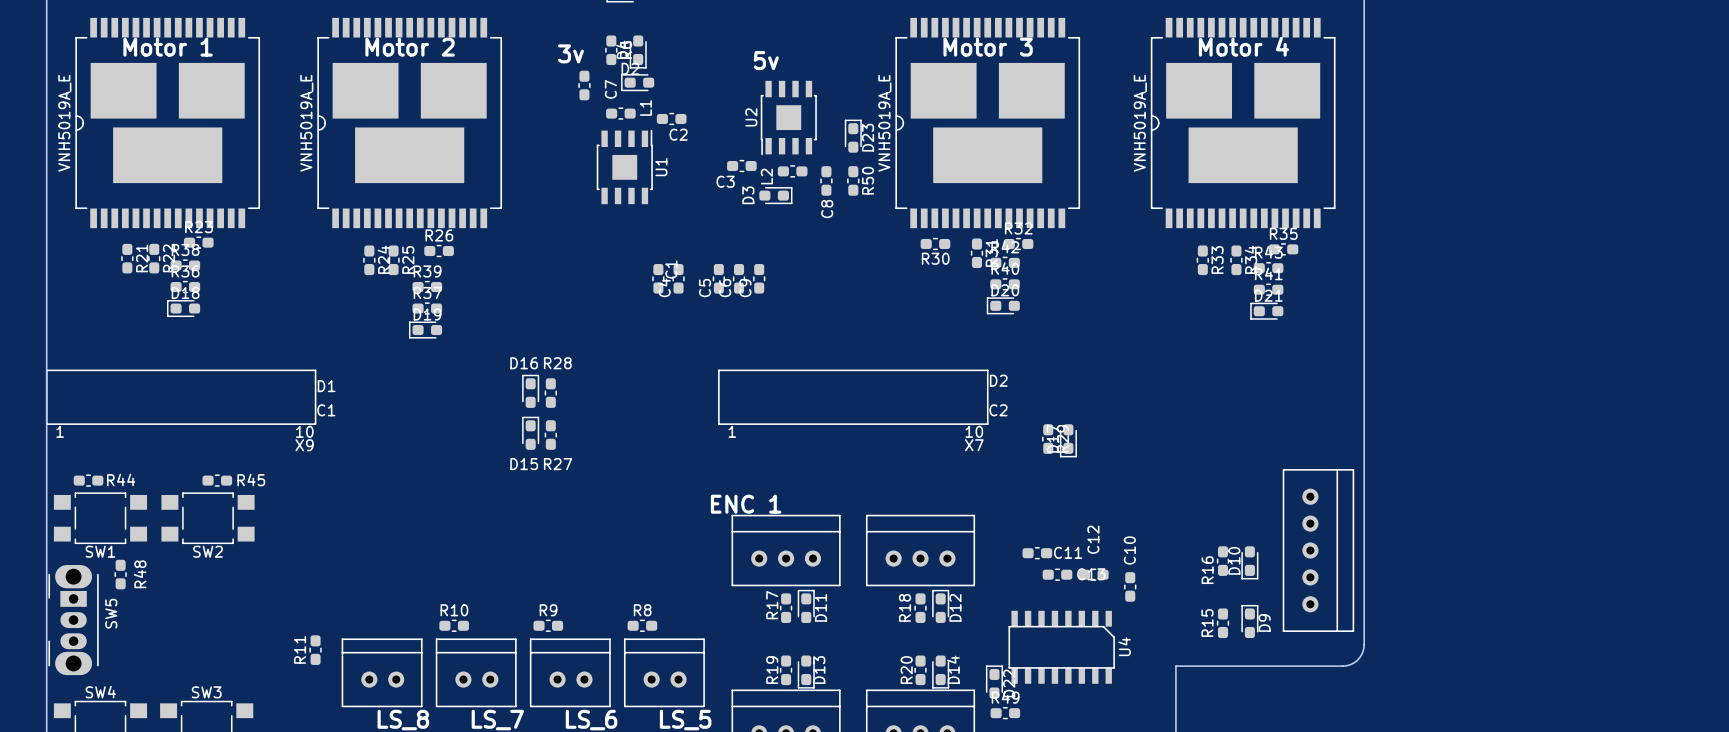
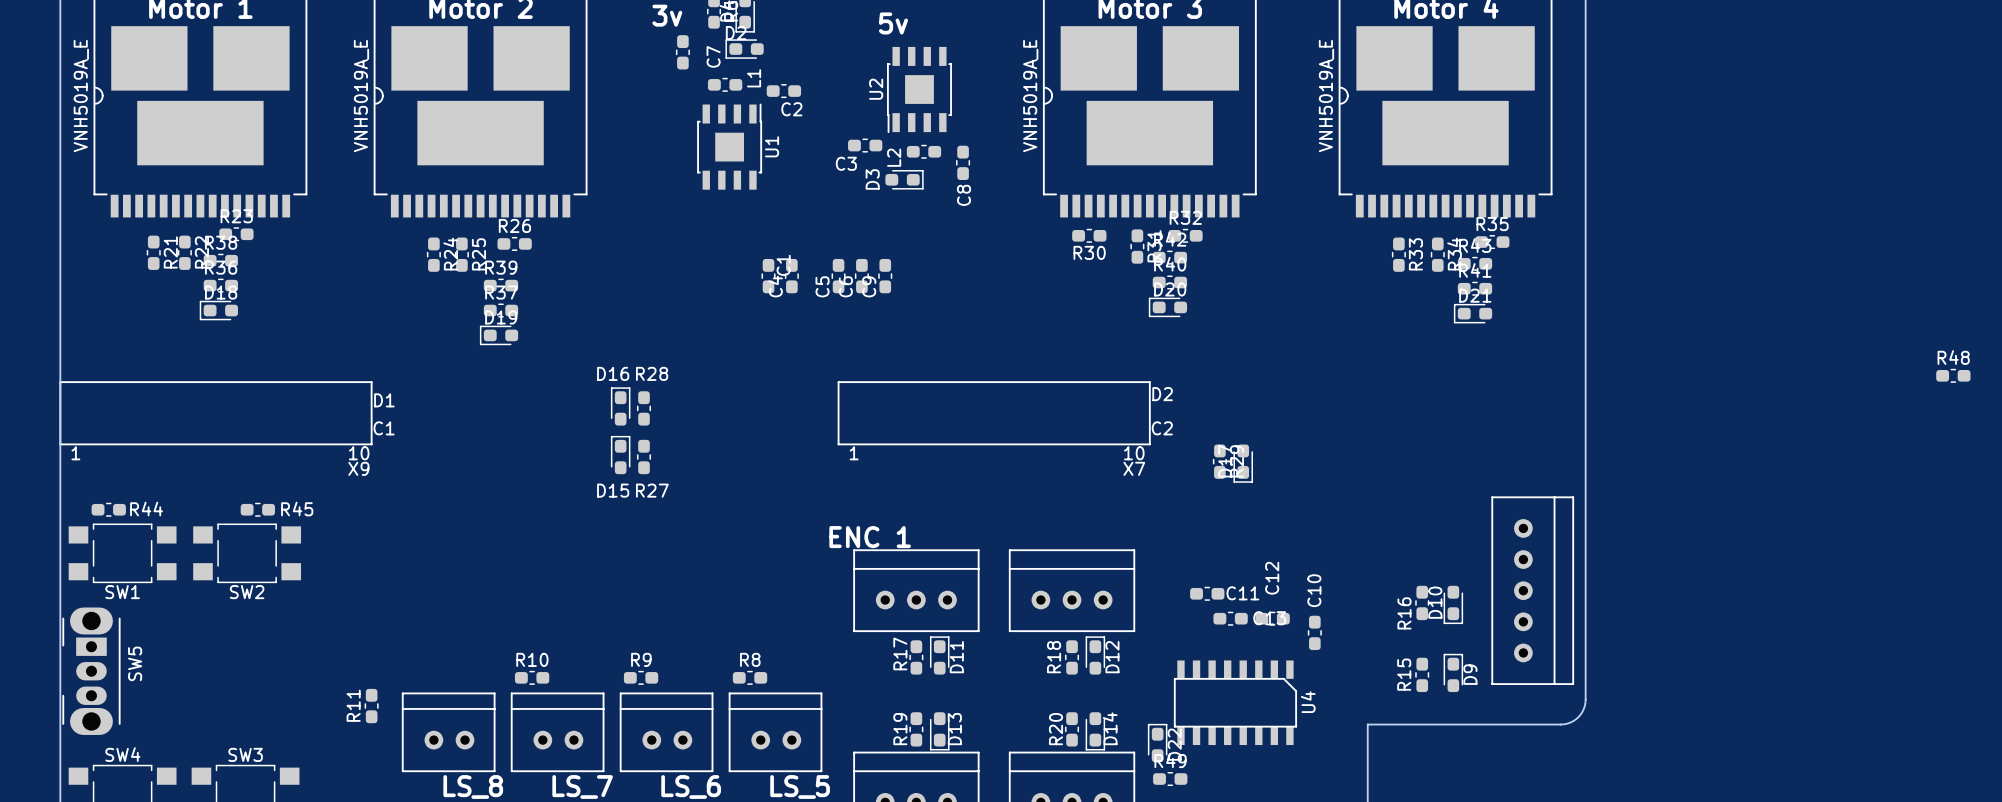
D23: (853, 136) -> none
R50: (853, 180) -> none
R48 rotation: 0° (120, 574) -> 90° clockwise (1953, 375)
R48 position: (120, 574) -> (1953, 375)
R48 name position: R48 (140, 574) -> R48 (1953, 357)

